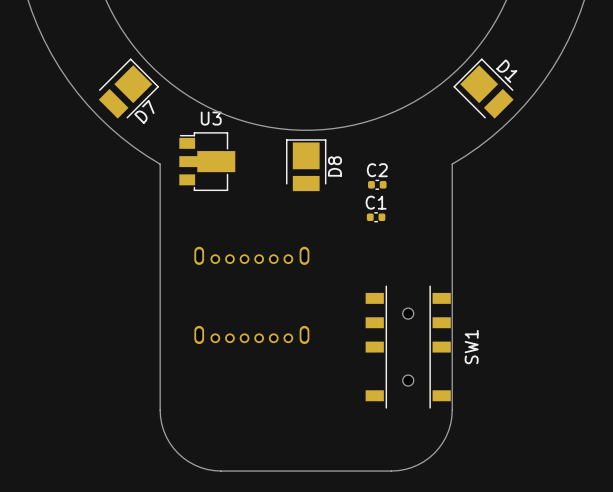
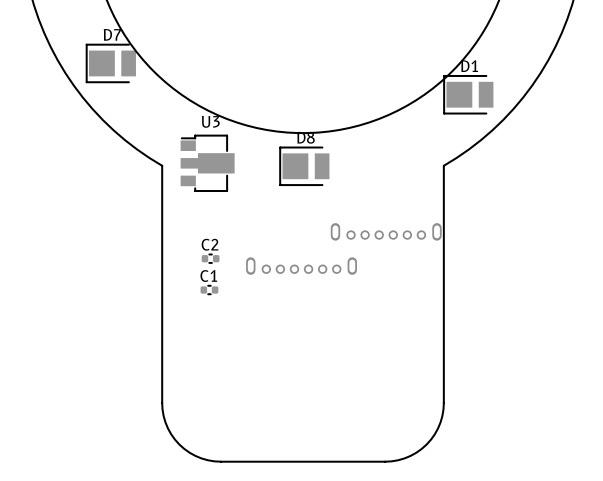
D7 rotation: 0° (128, 88) -> 135° counterclockwise (110, 63)
D7 position: (128, 88) -> (110, 63)
D1 rotation: 0° (483, 88) -> 45° counterclockwise (468, 94)
D8 rotation: 0° (306, 165) -> 90° counterclockwise (304, 166)
C2 position: (377, 184) -> (210, 258)
C1 position: (376, 217) -> (209, 290)
part: none -> (386, 231)
part: (251, 255) -> none
part: none -> (301, 266)
part: (251, 334) -> none
SW1: (408, 347) -> none

